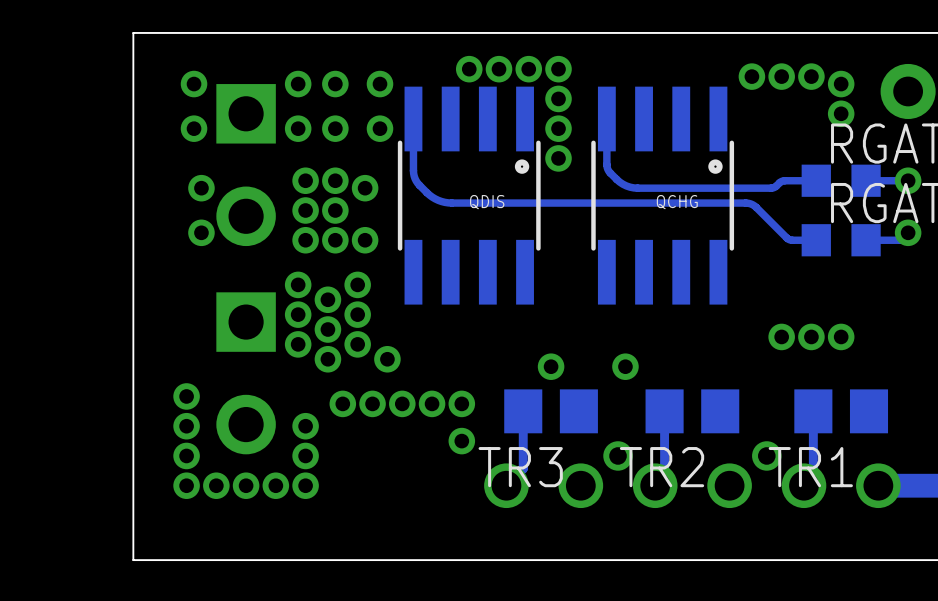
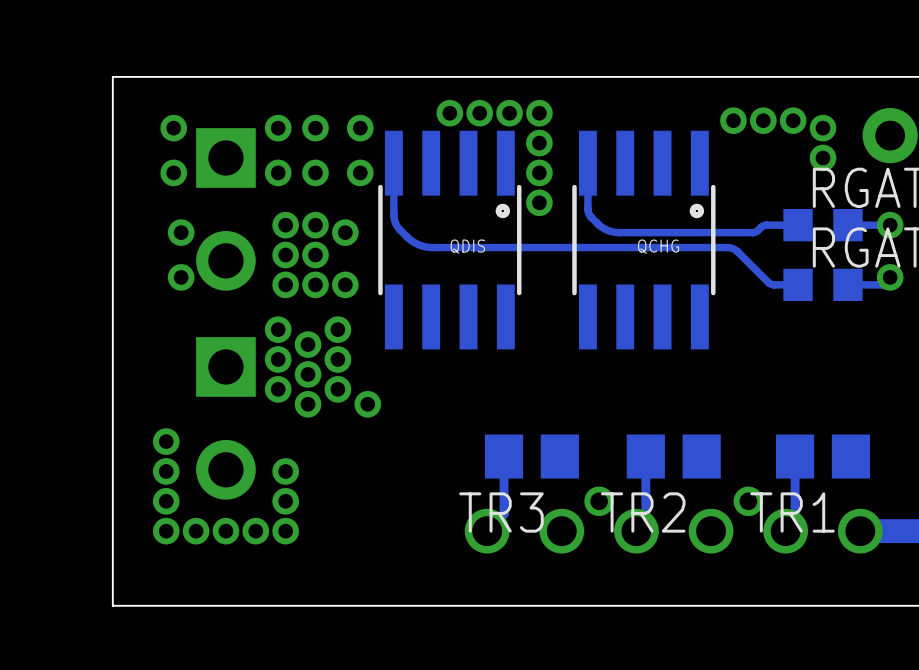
via: (781, 336) -> none
via: (811, 336) -> none
via: (841, 336) -> none
via: (551, 366) -> none
via: (625, 366) -> none
via: (342, 403) -> none
via: (372, 403) -> none
via: (402, 403) -> none
via: (432, 403) -> none
via: (461, 403) -> none
via: (461, 441) -> none

